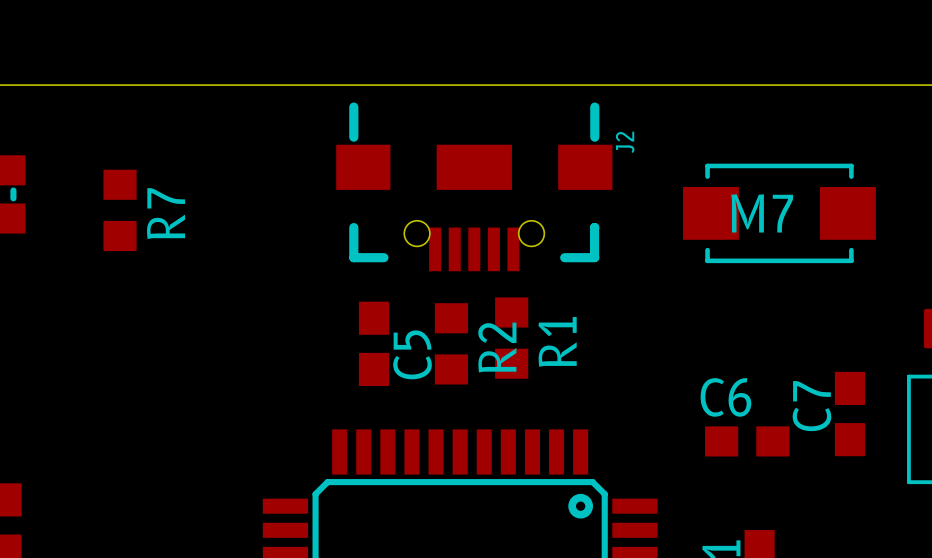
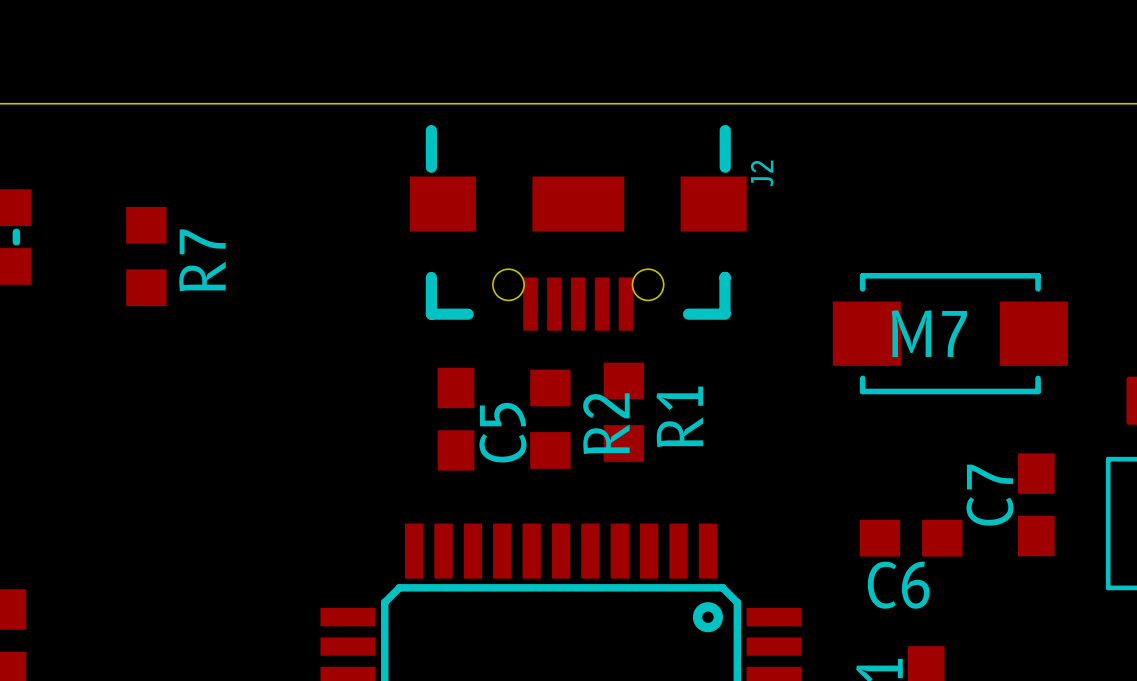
part position: (779, 213) -> (950, 333)
C6 name position: C6 (725, 397) -> C6 (898, 585)

